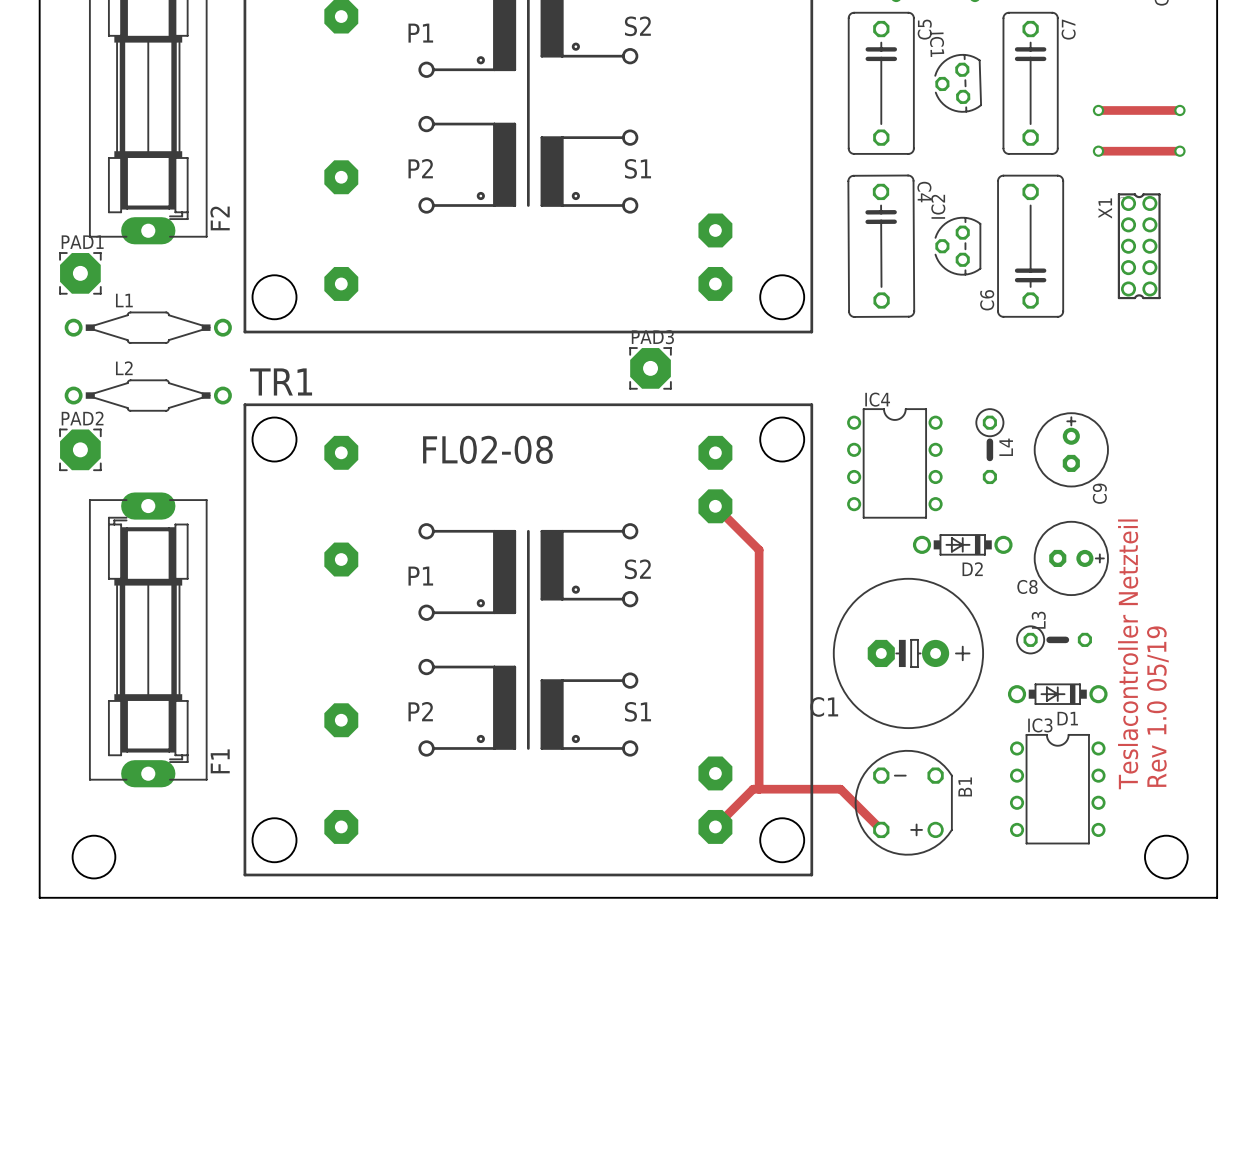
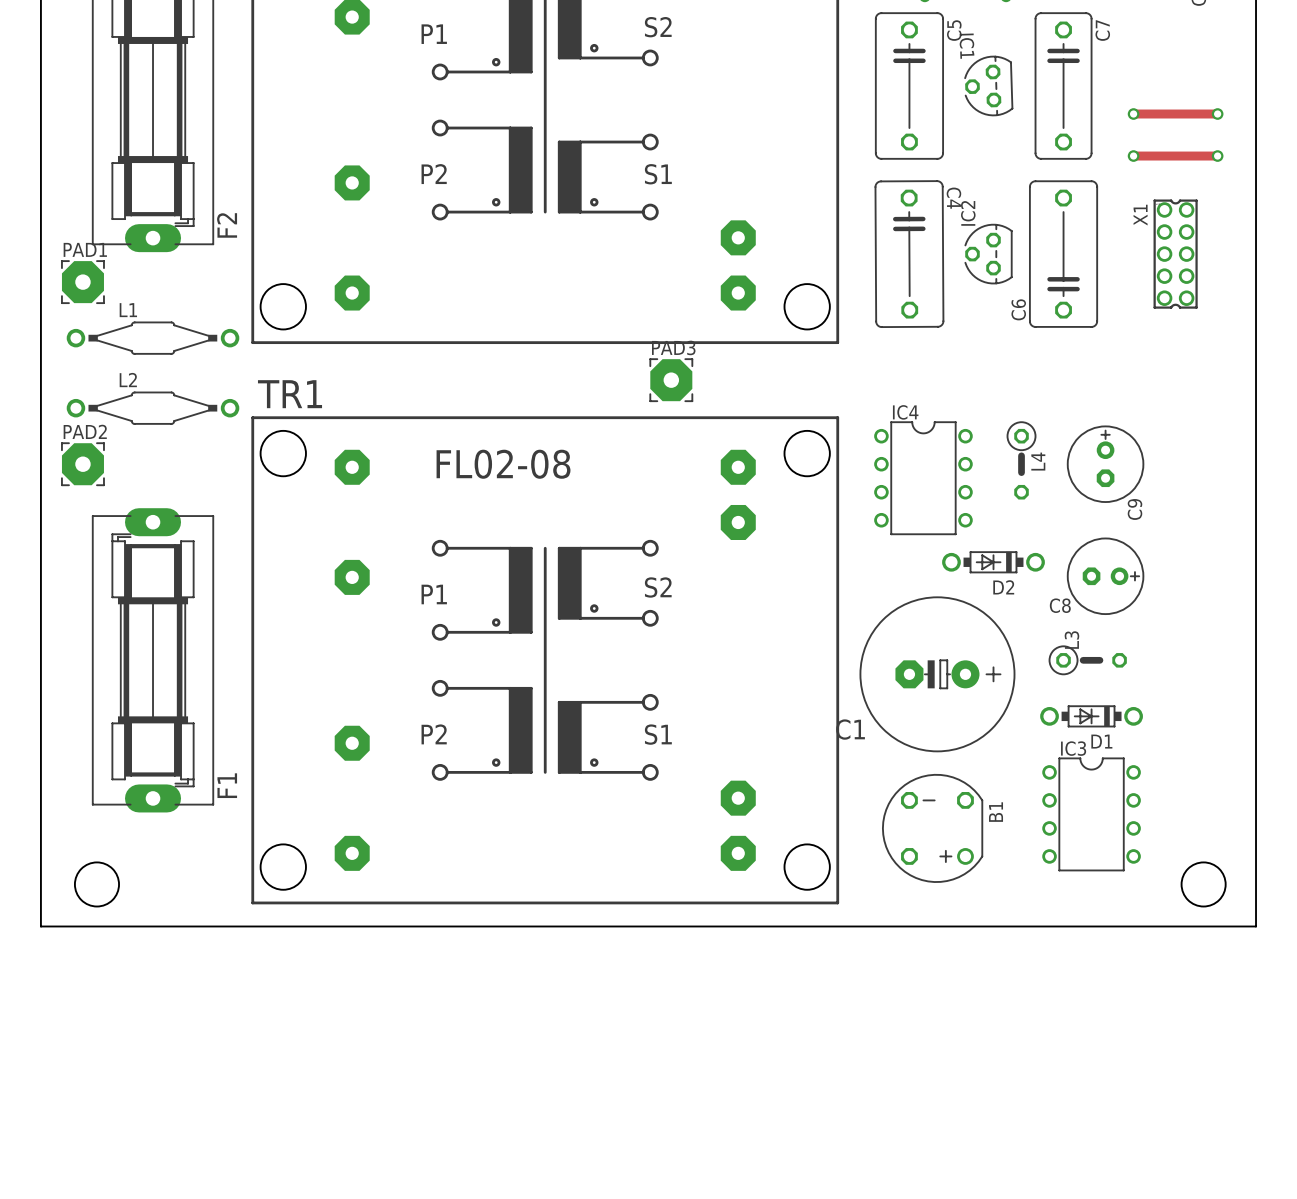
track: (715, 506) (759, 550) (759, 789) -> none
text: Teslacontroller Netzteil (1128, 654) -> none
text: Rev 1.0 05/19 (1157, 706) -> none
track: (715, 826) (753, 789) (840, 789) (881, 829) -> none

